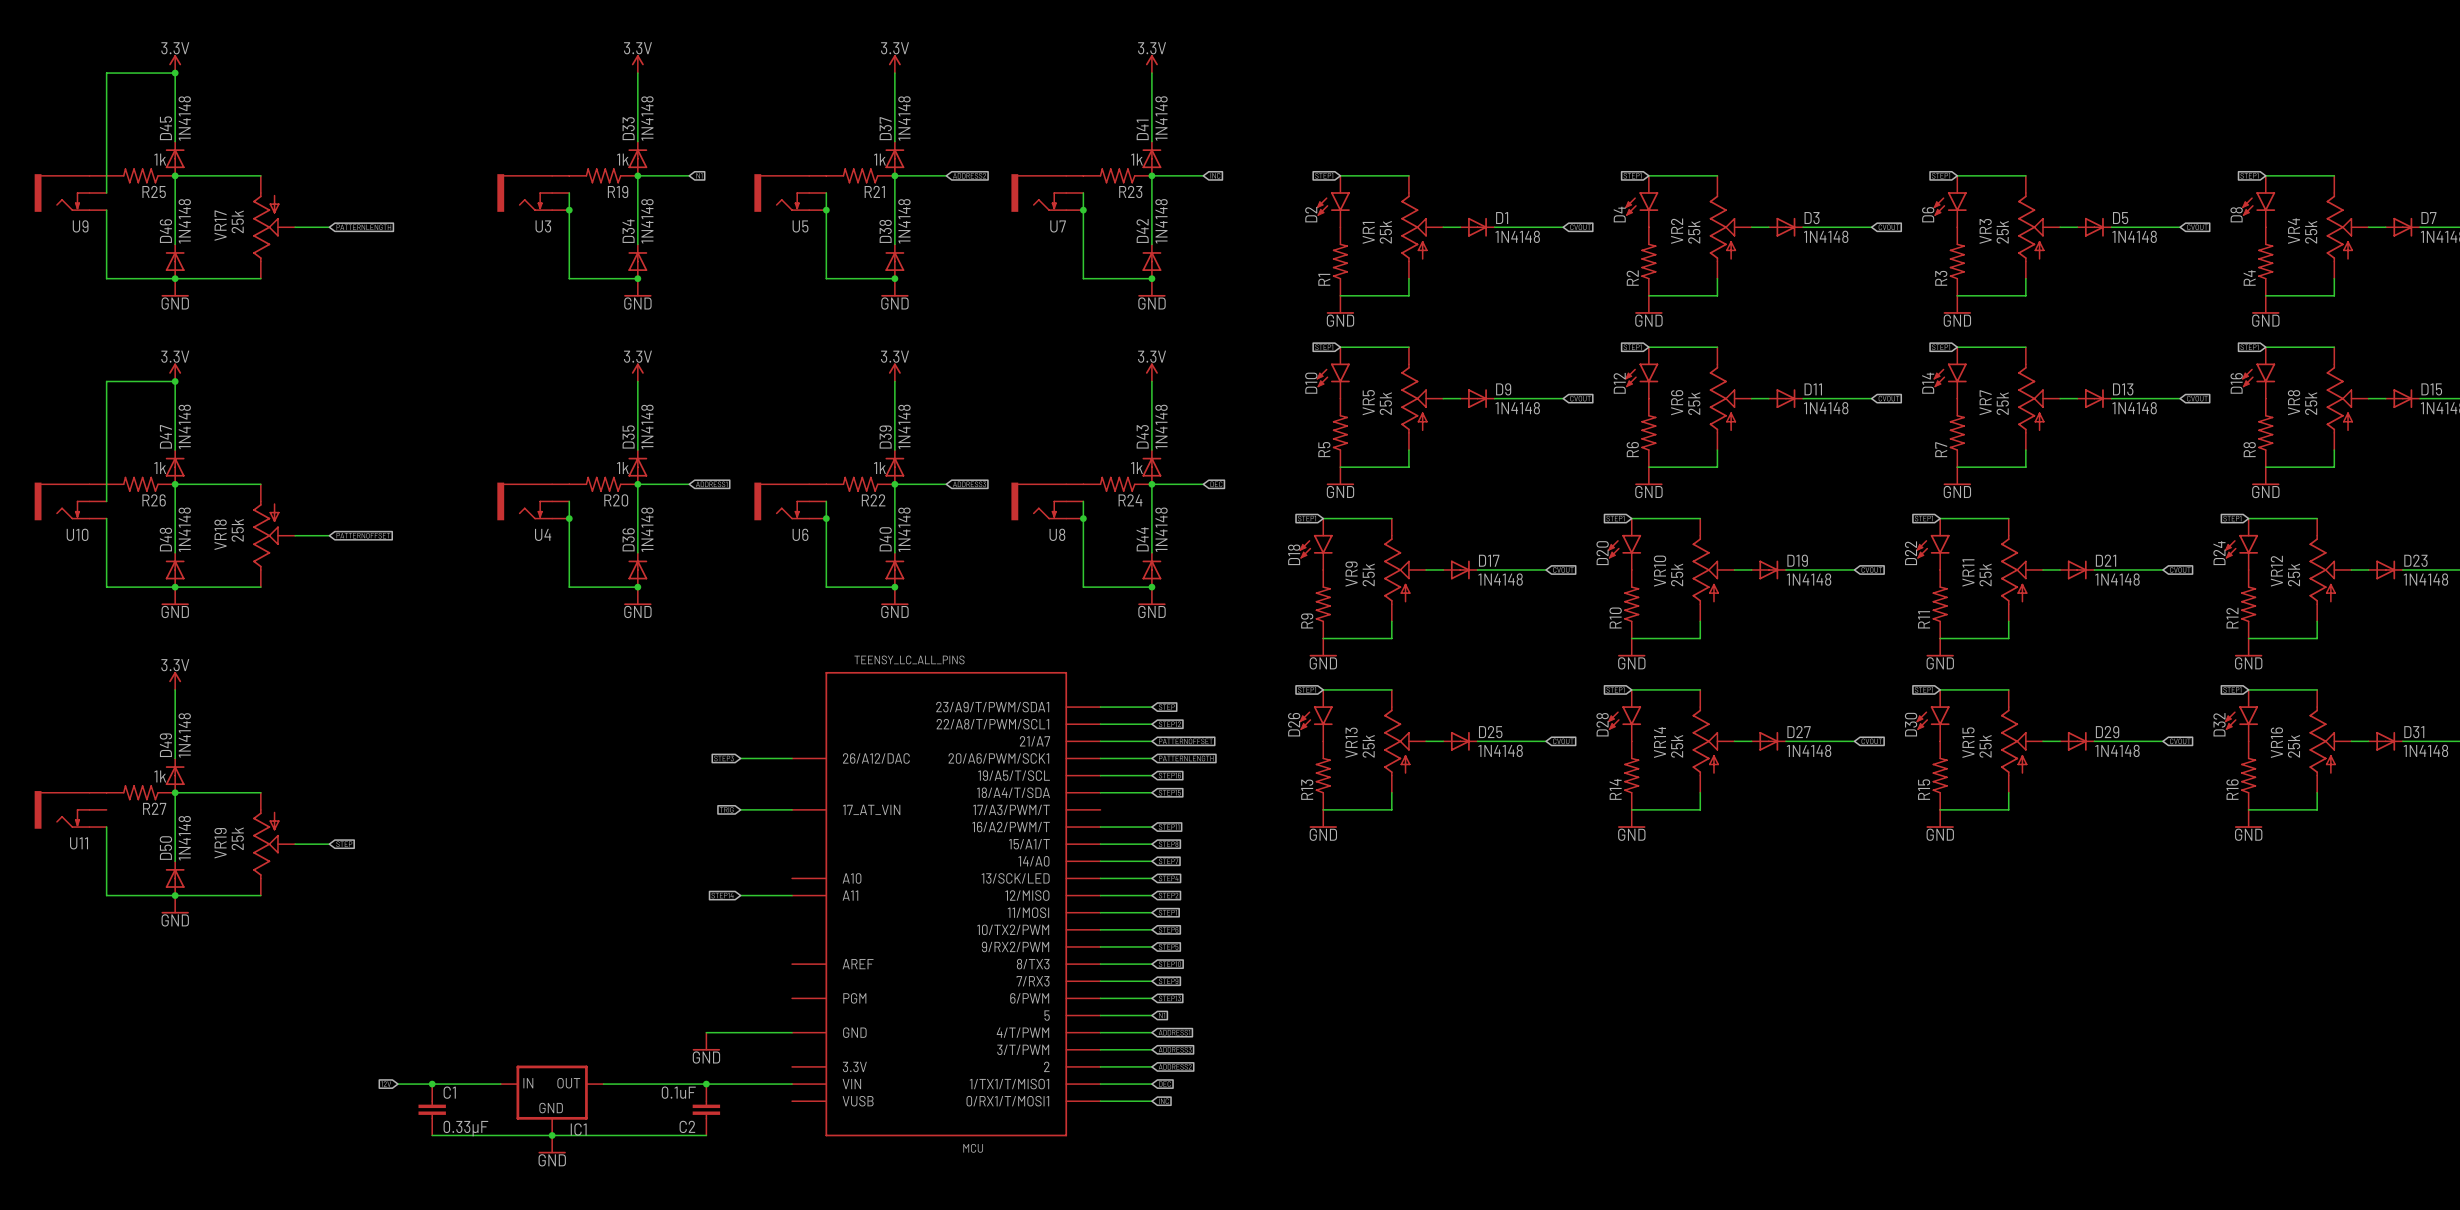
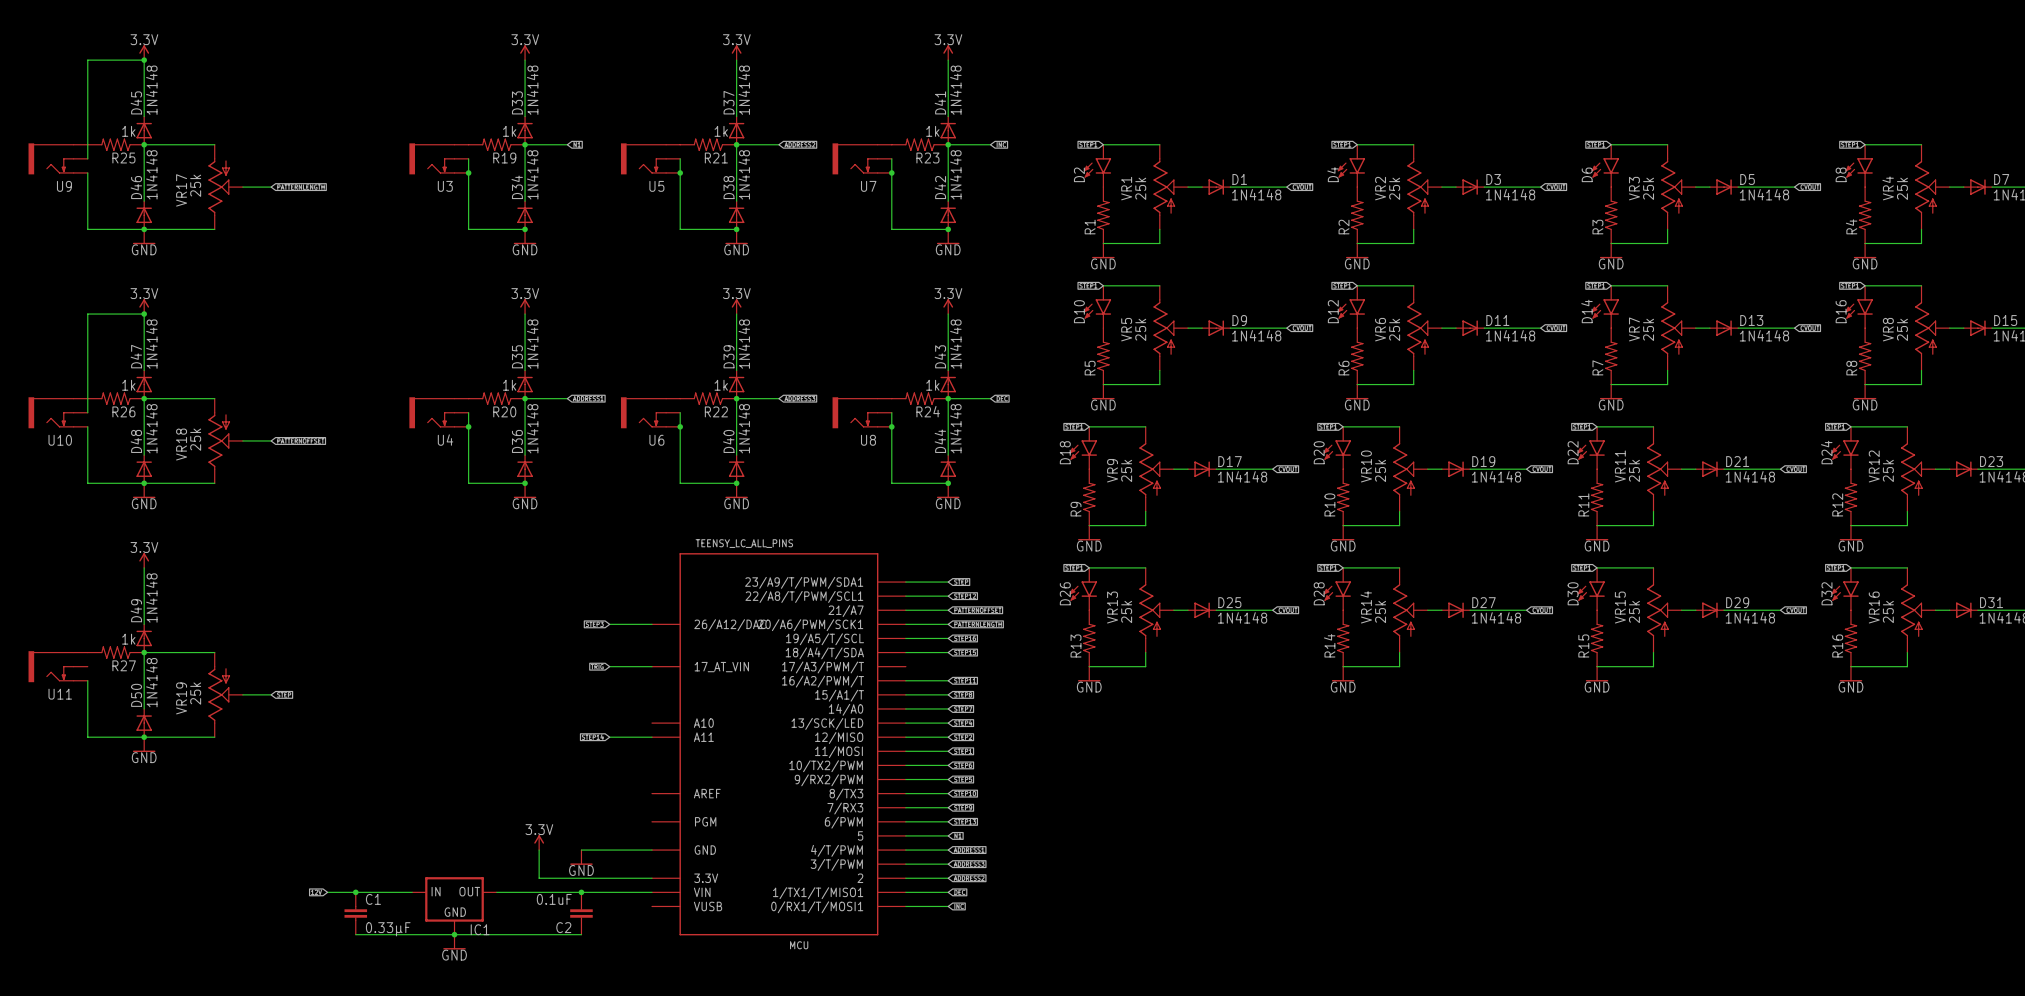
power symbol: none -> 3.3V (539, 842)
wire: none -> (539, 850) (539, 878) (651, 878)

